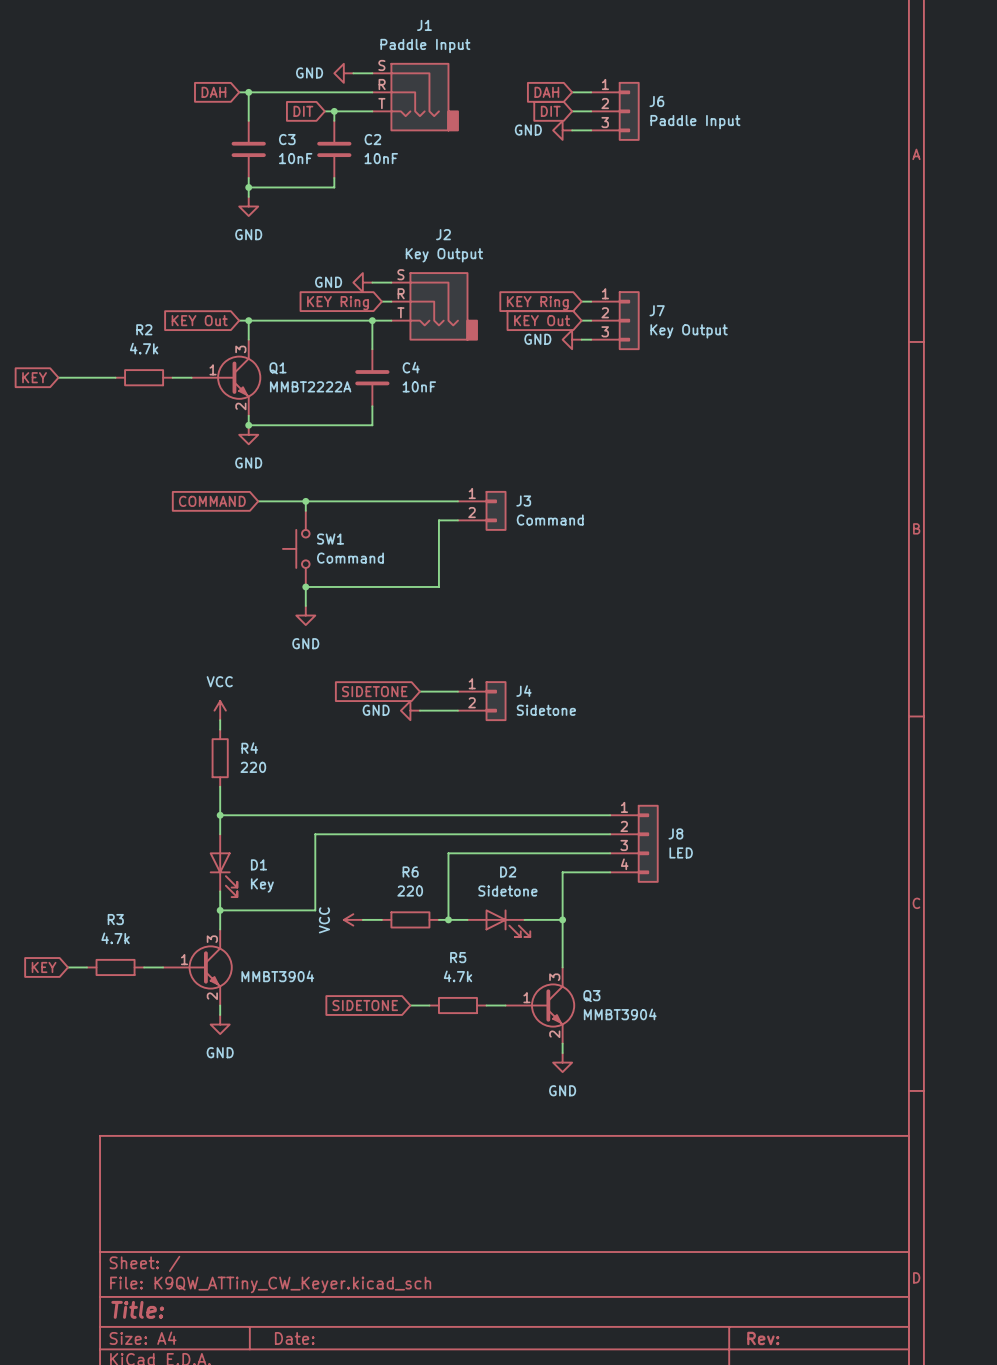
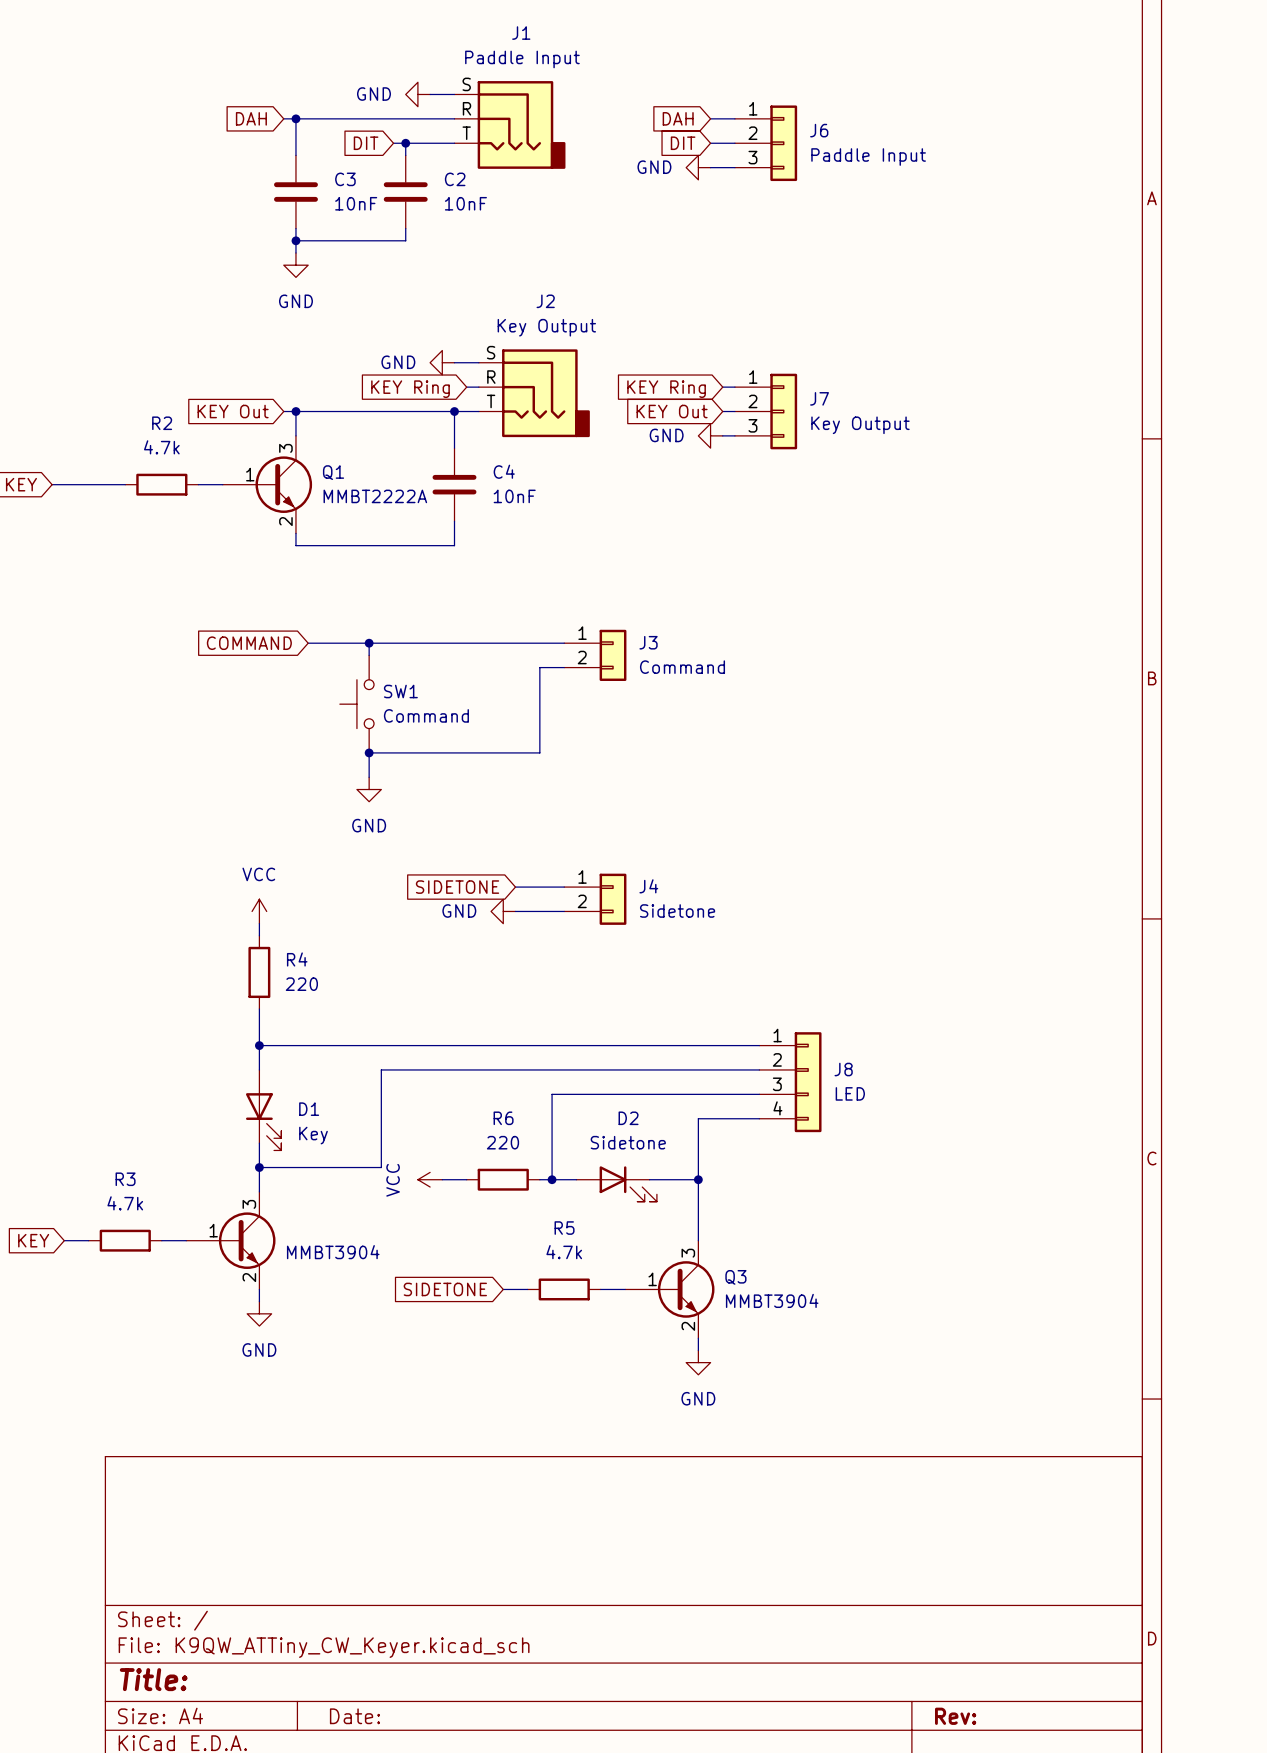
junction: (248, 425) -> none
power symbol: GND (248, 434) -> none

